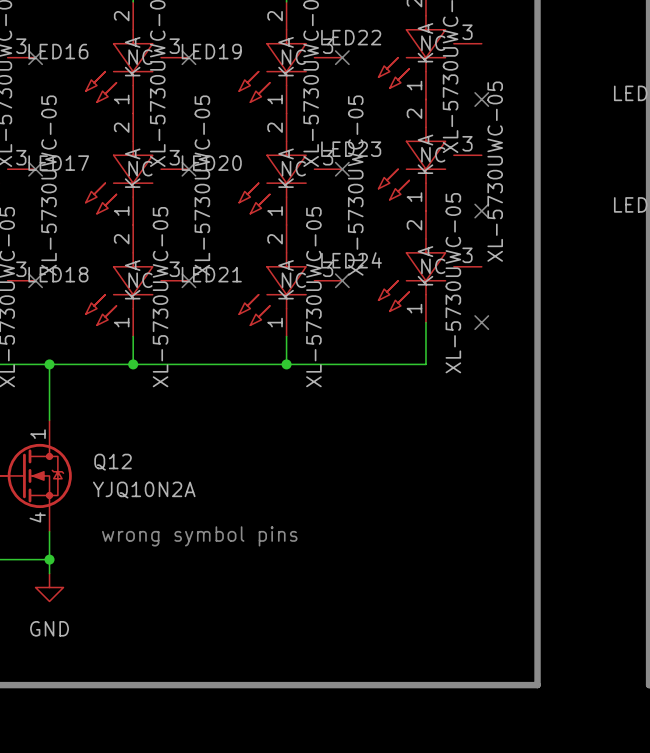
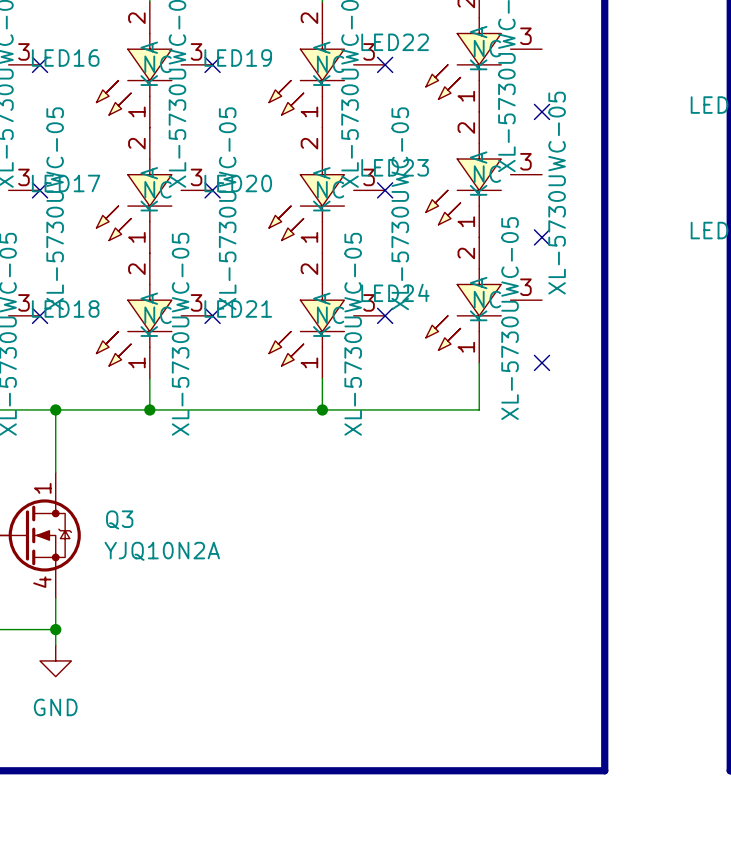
Q12 name: Q12 (113, 462) -> Q3 (119, 519)
text: wrong symbol pins (199, 536) -> none

